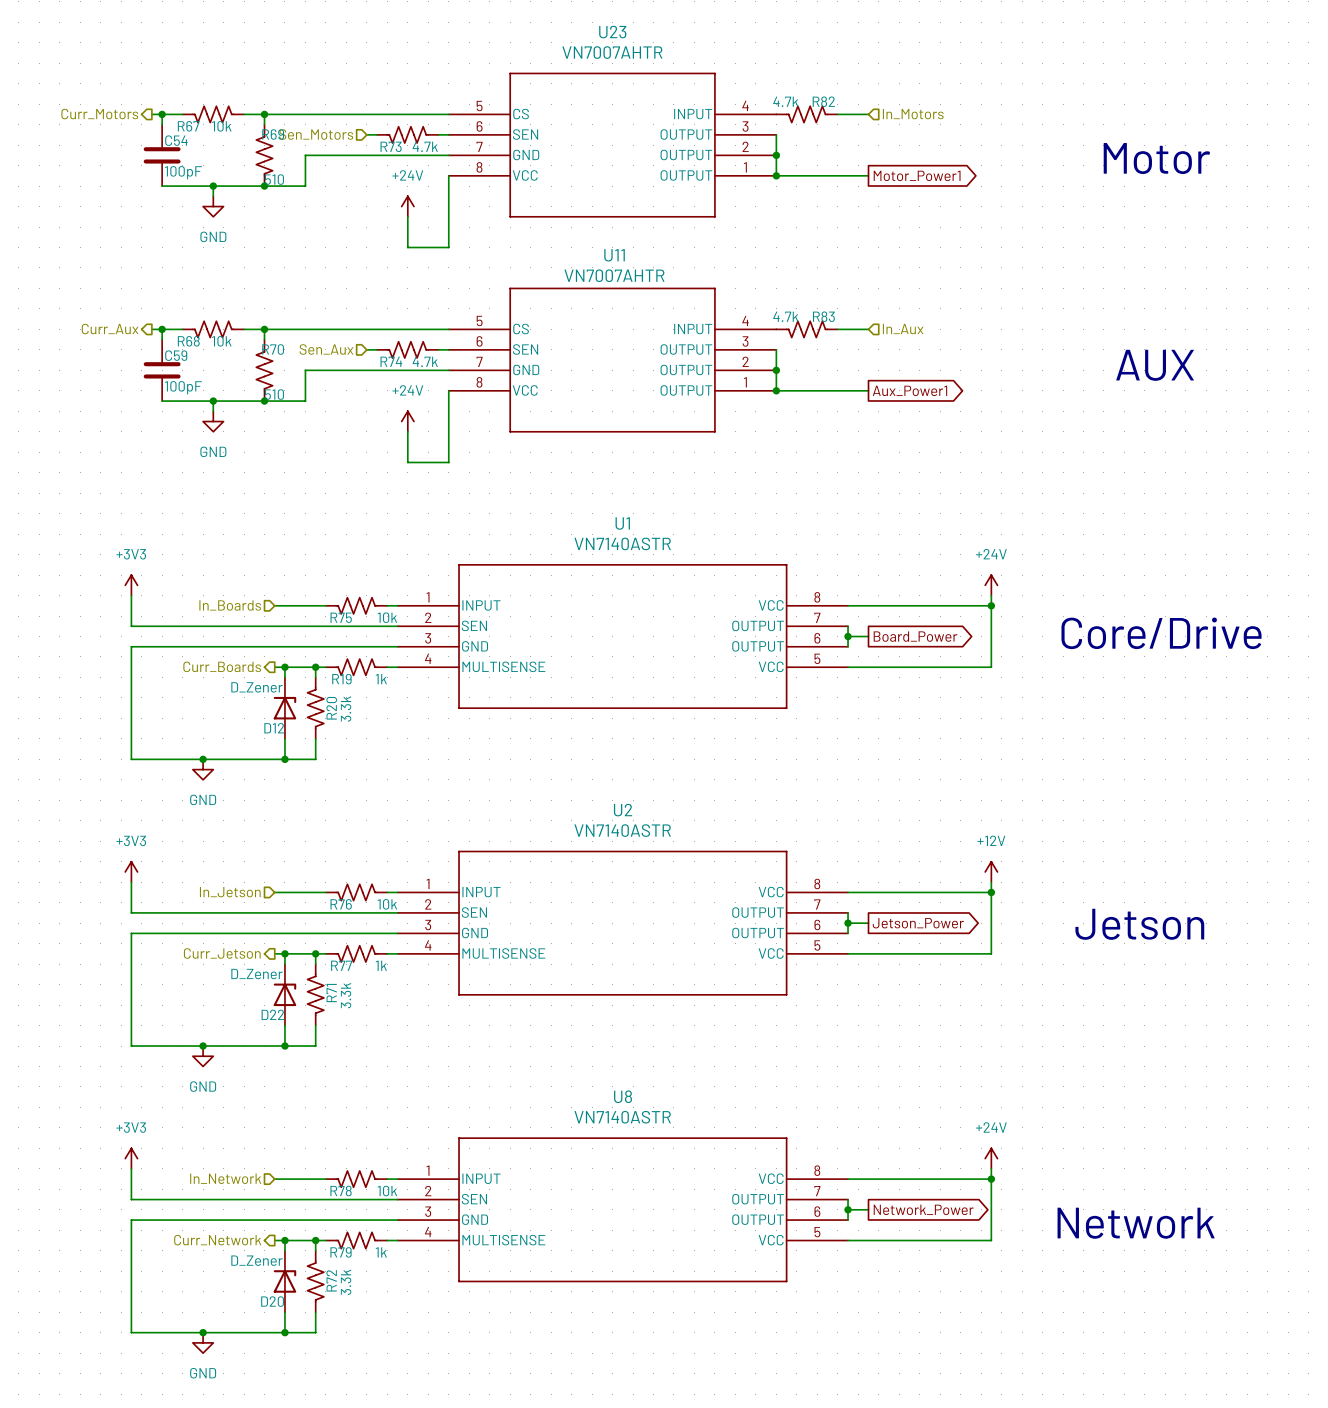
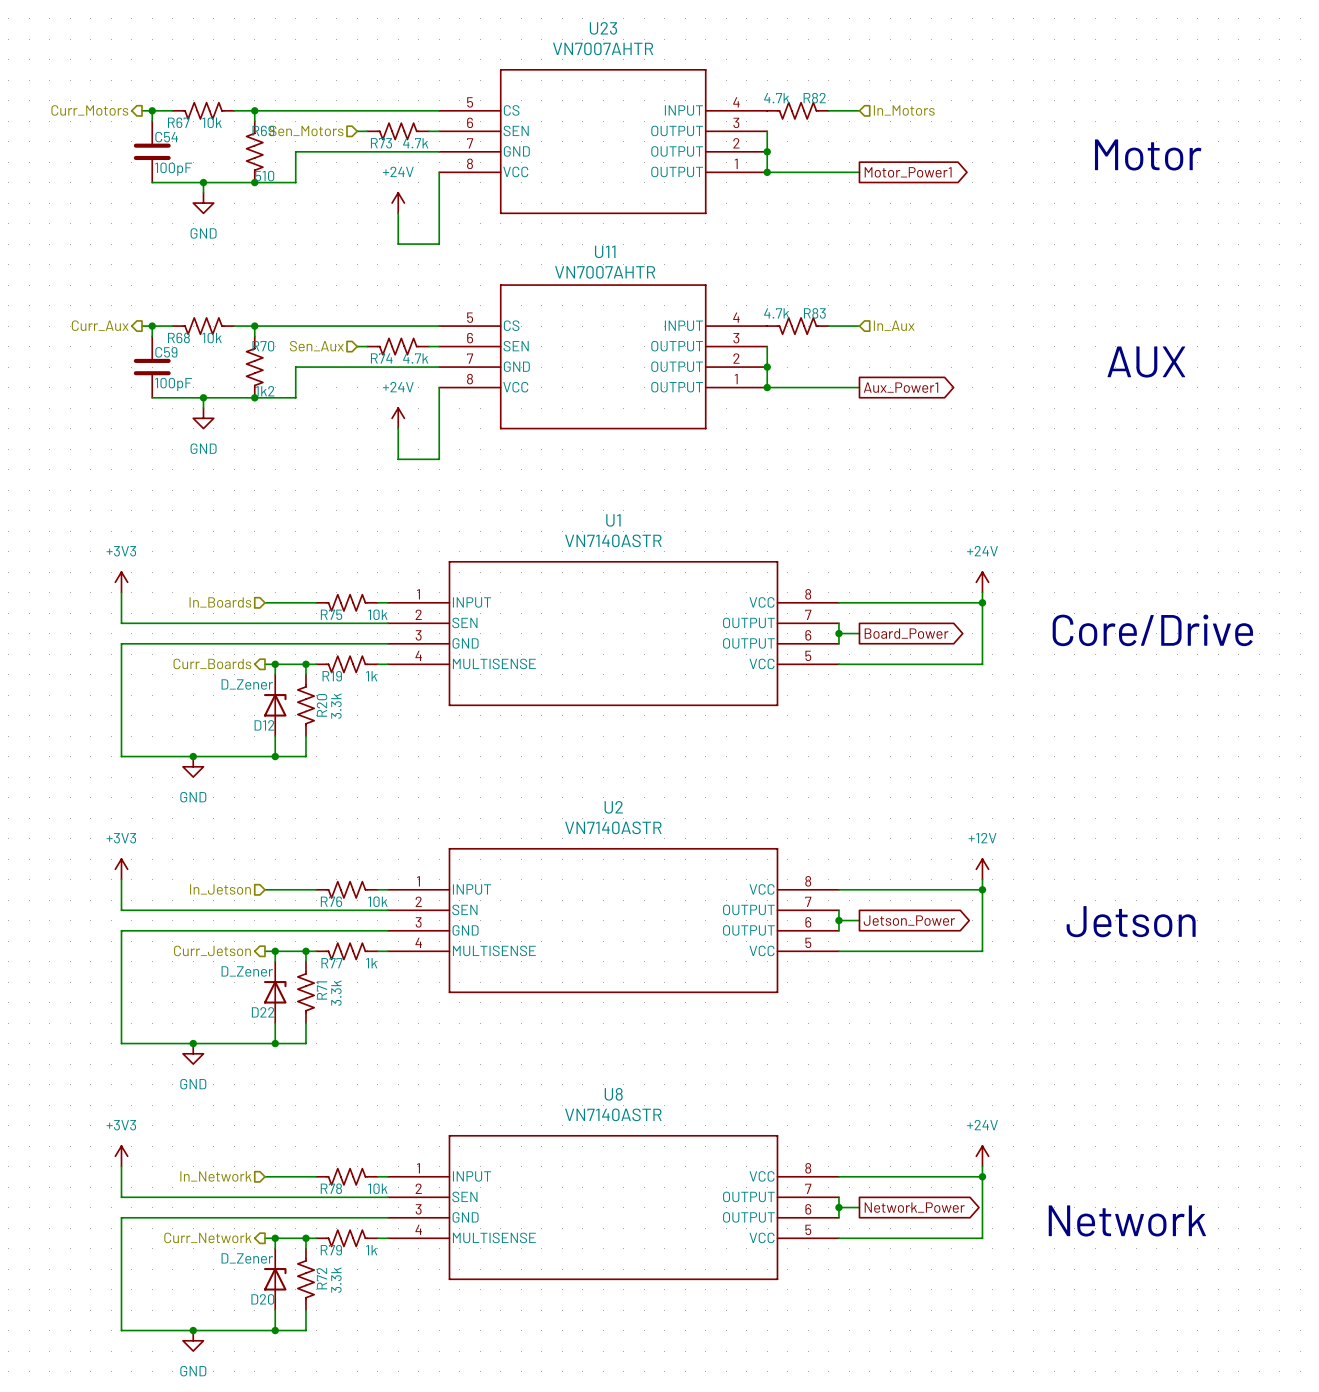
R70 value: 510 (274, 394) -> 1k2 (265, 391)

